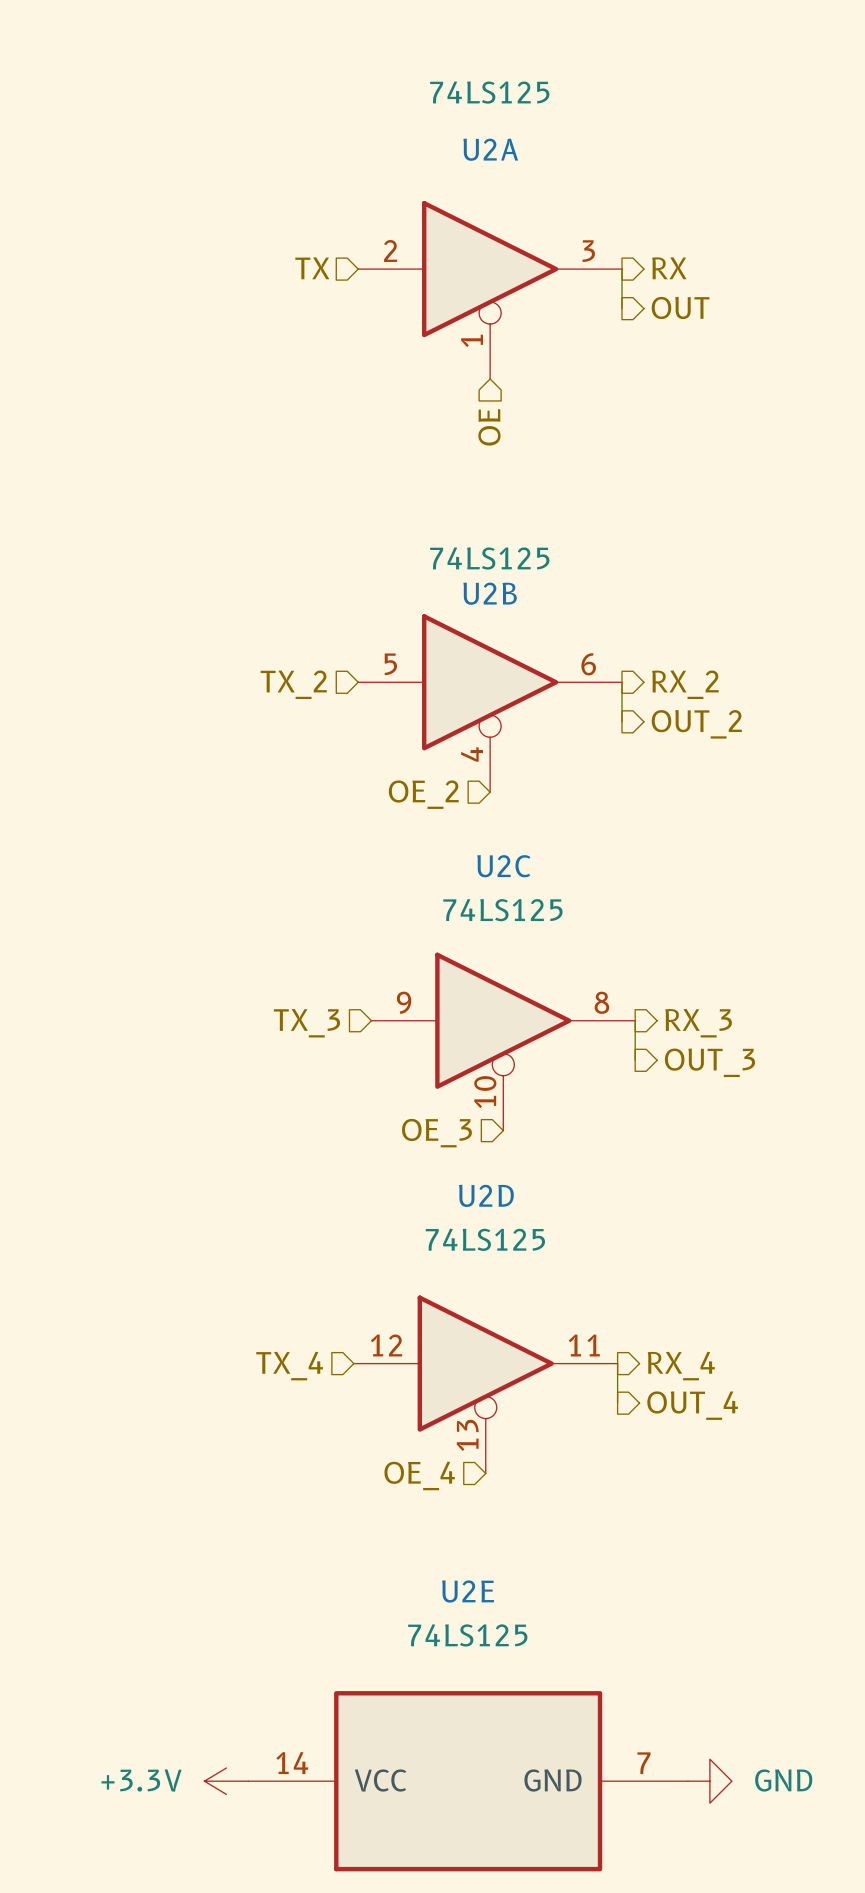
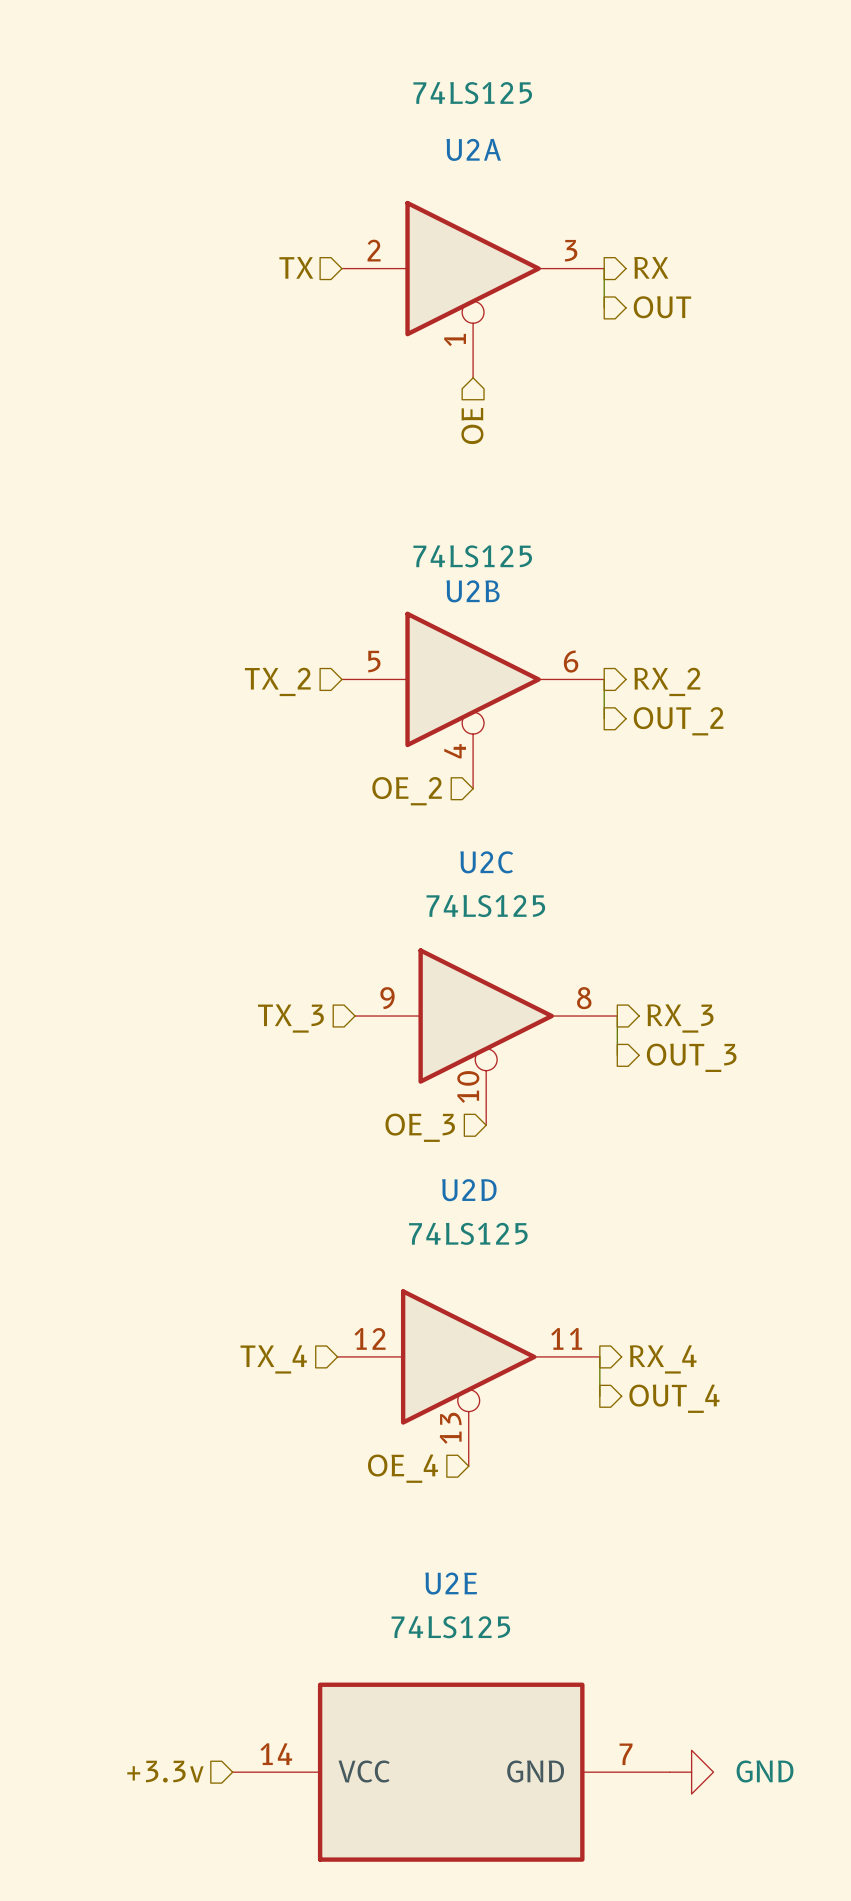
hierarchical label: none -> +3.3v (165, 1771)
power symbol: +3.3V (226, 1781) -> none

